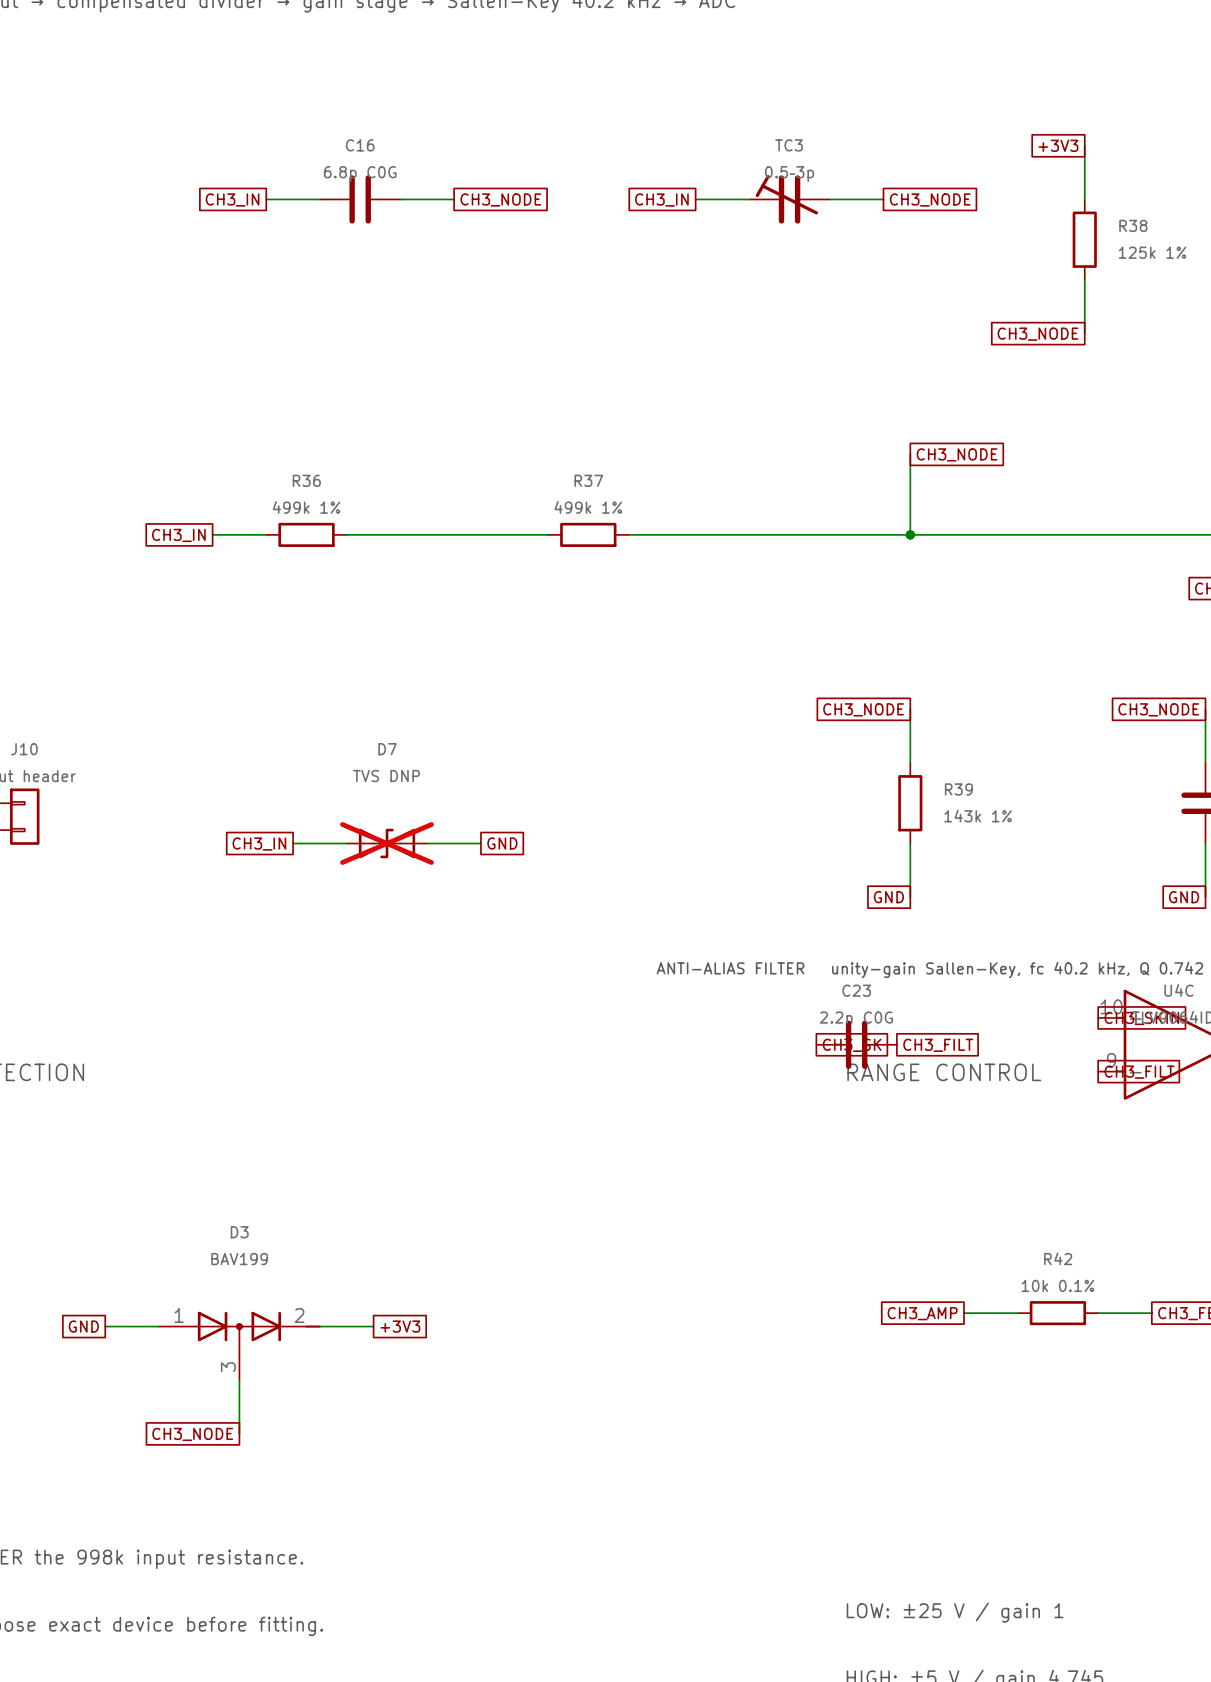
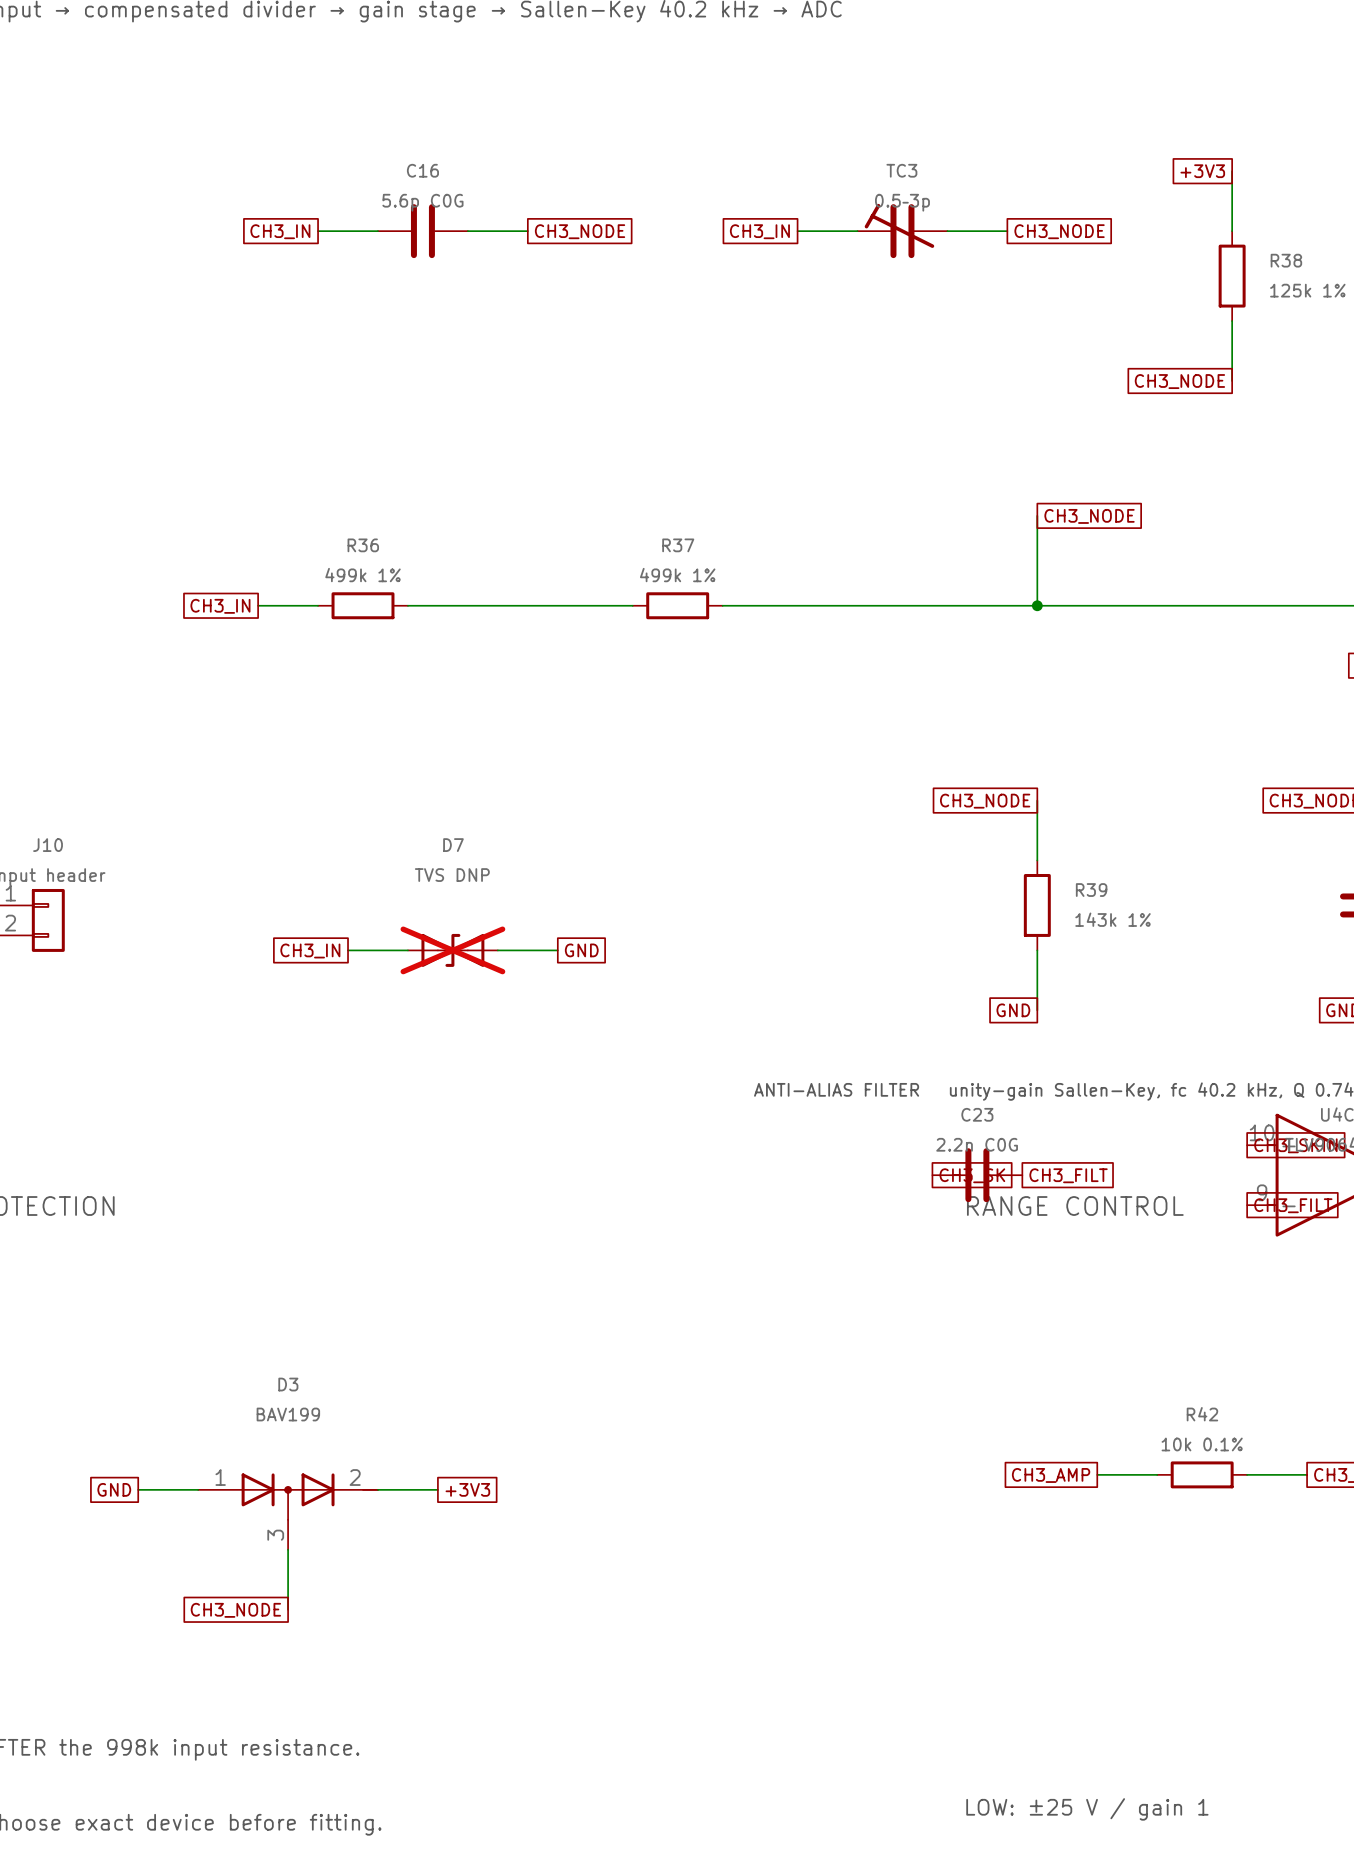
C16 value: 6.8p C0G (360, 174) -> 5.6p C0G (422, 202)

